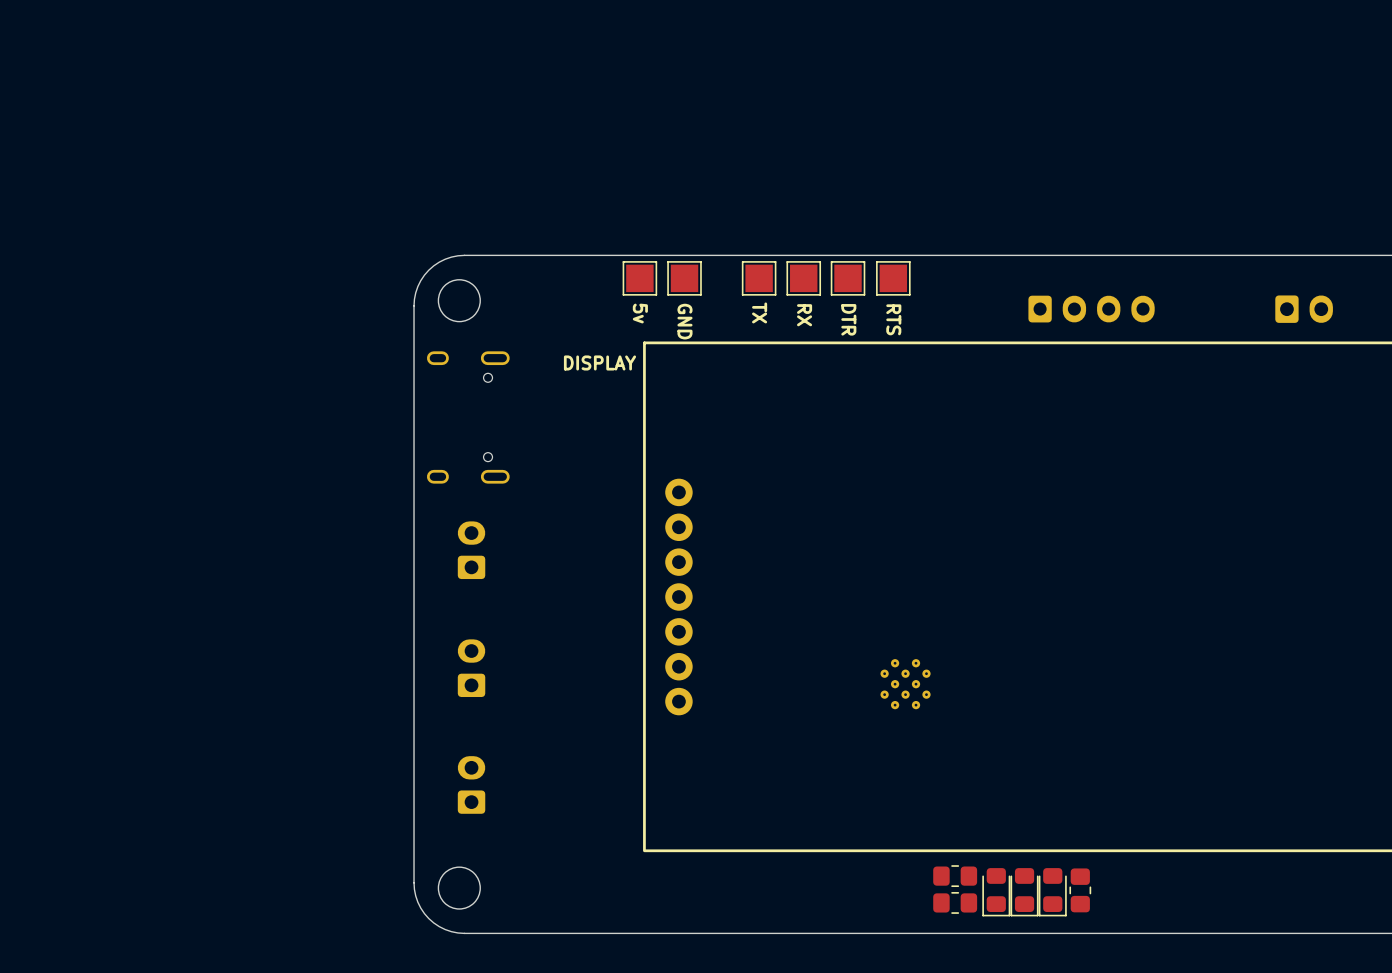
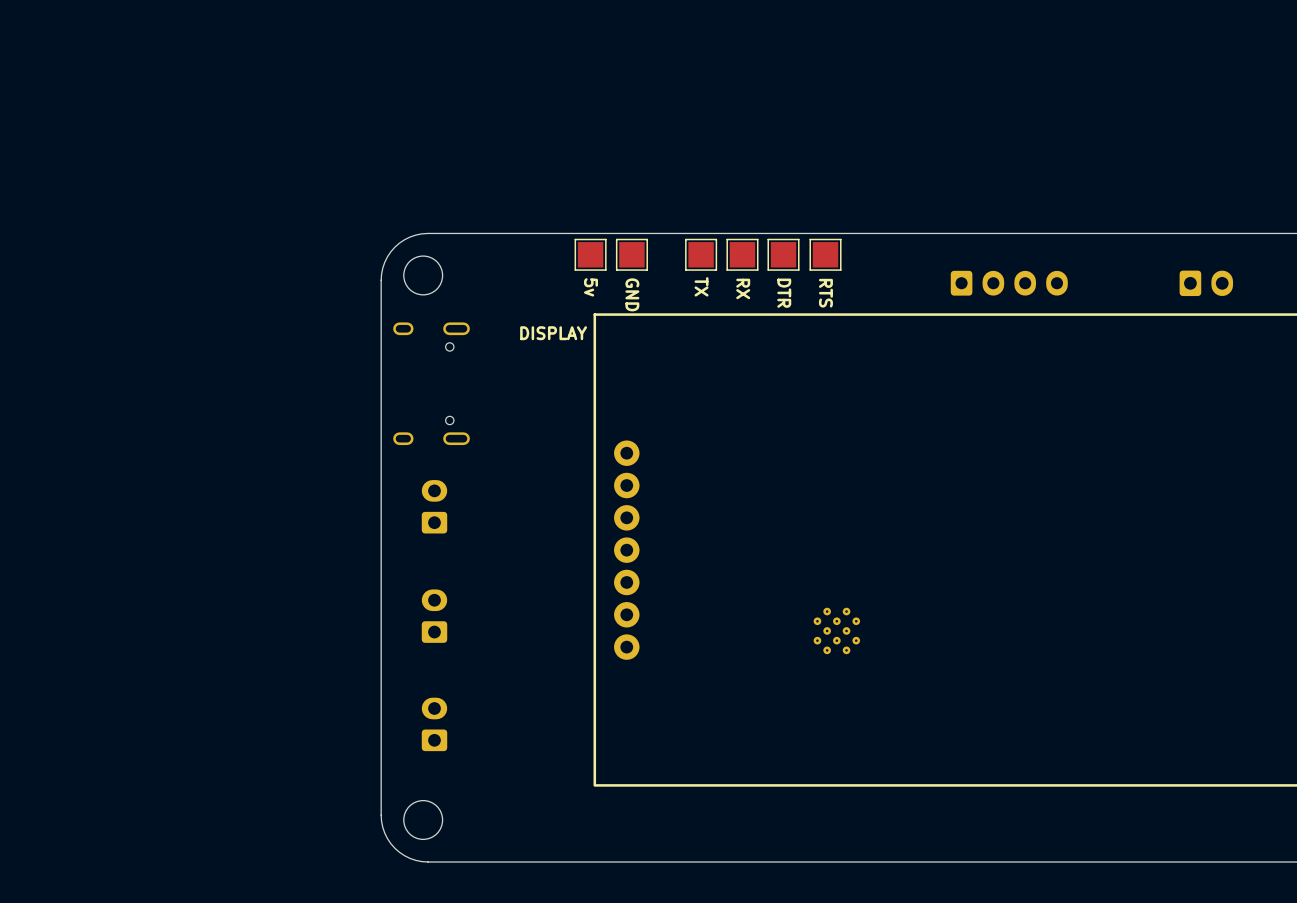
part: (955, 876) -> none
part: (1080, 890) -> none
part: (996, 892) -> none
part: (1024, 892) -> none
part: (1052, 892) -> none
part: (955, 902) -> none

